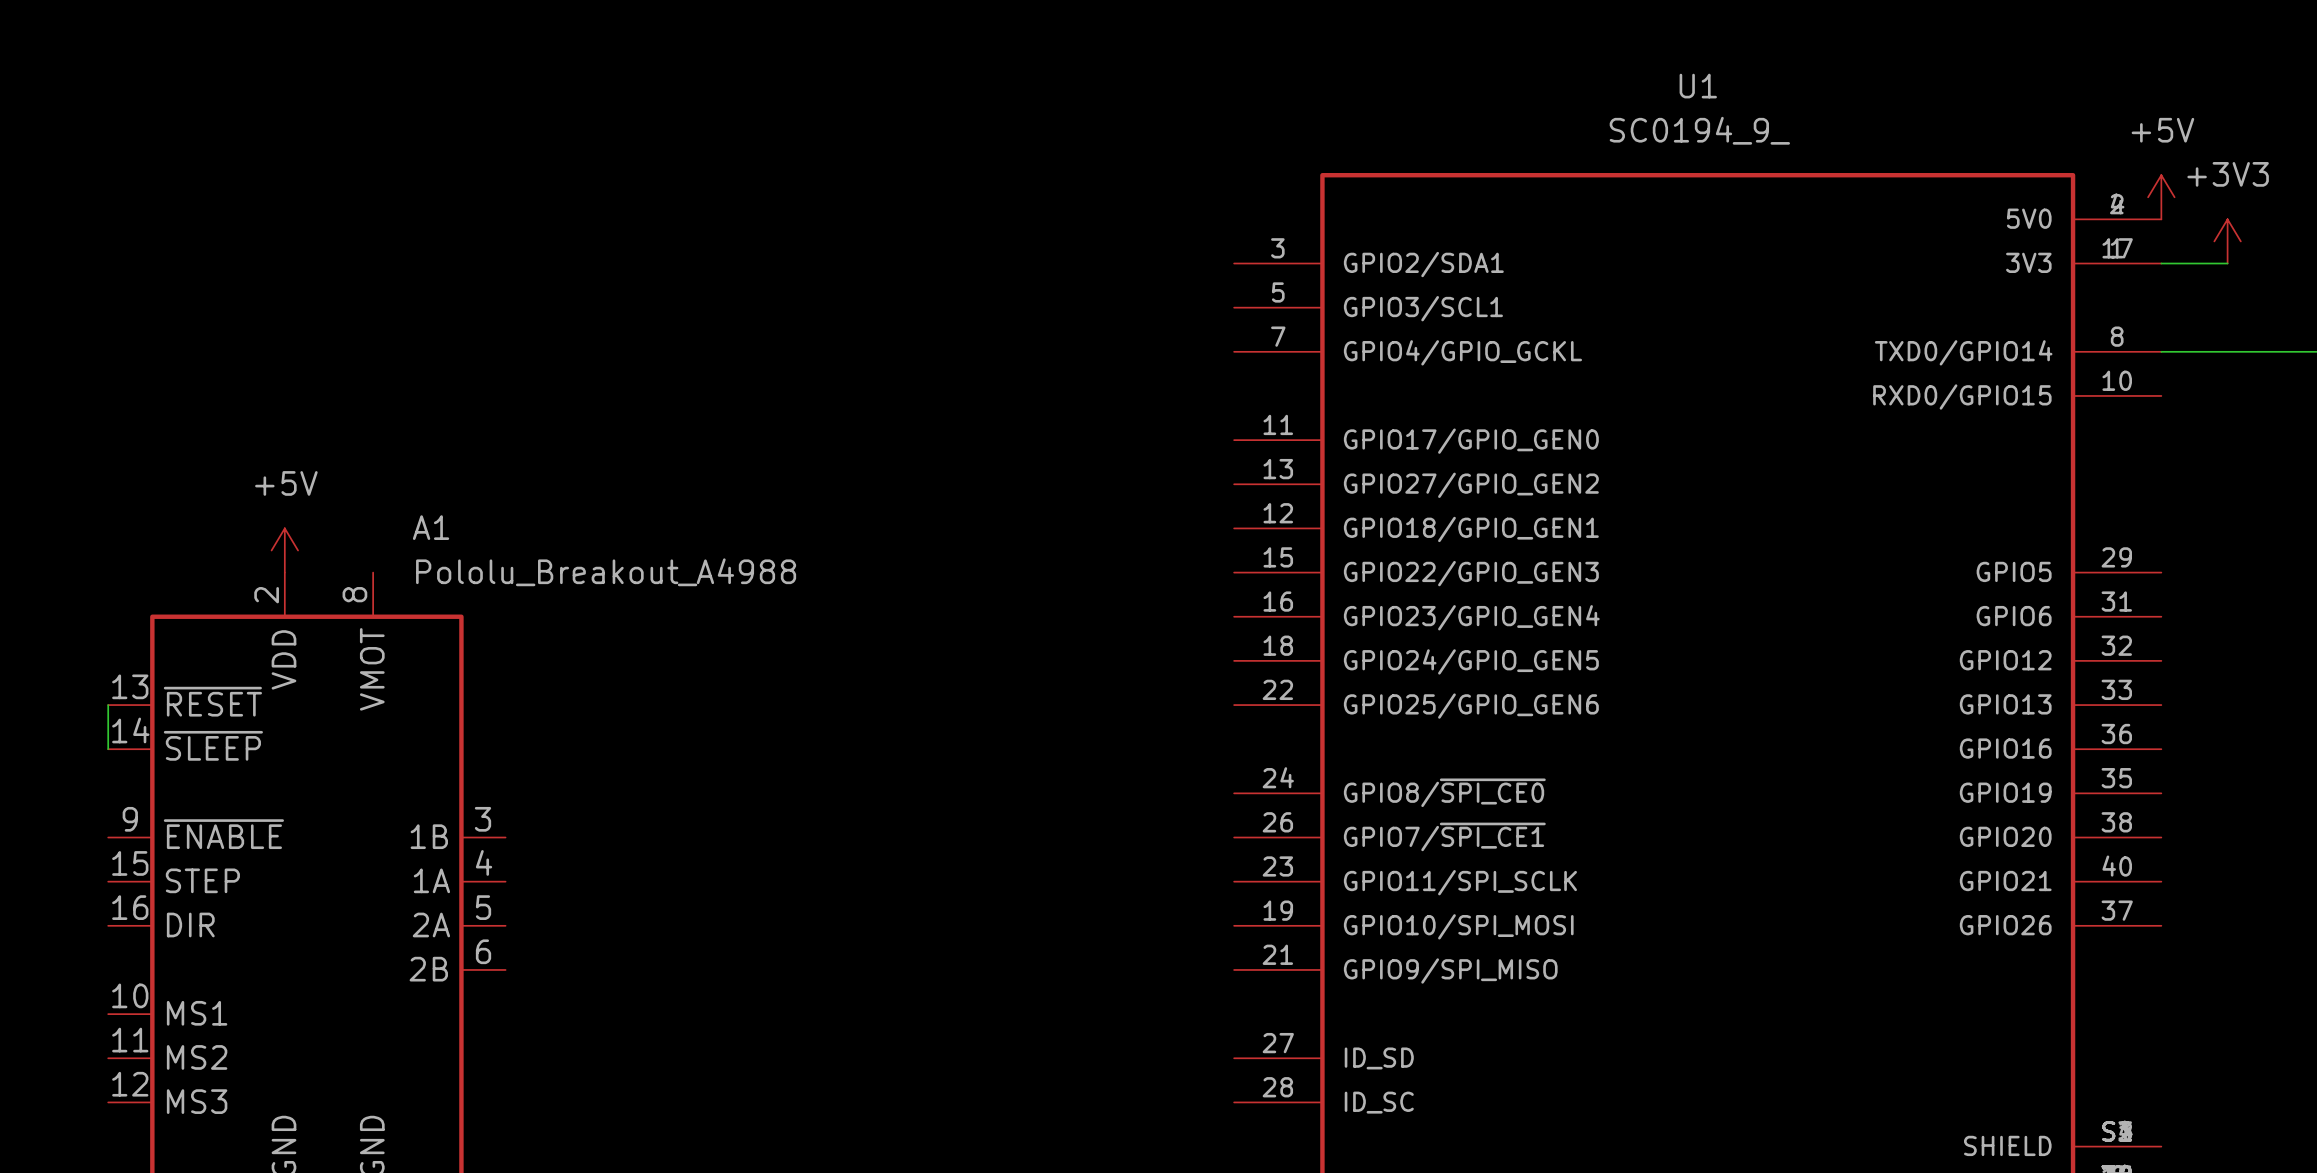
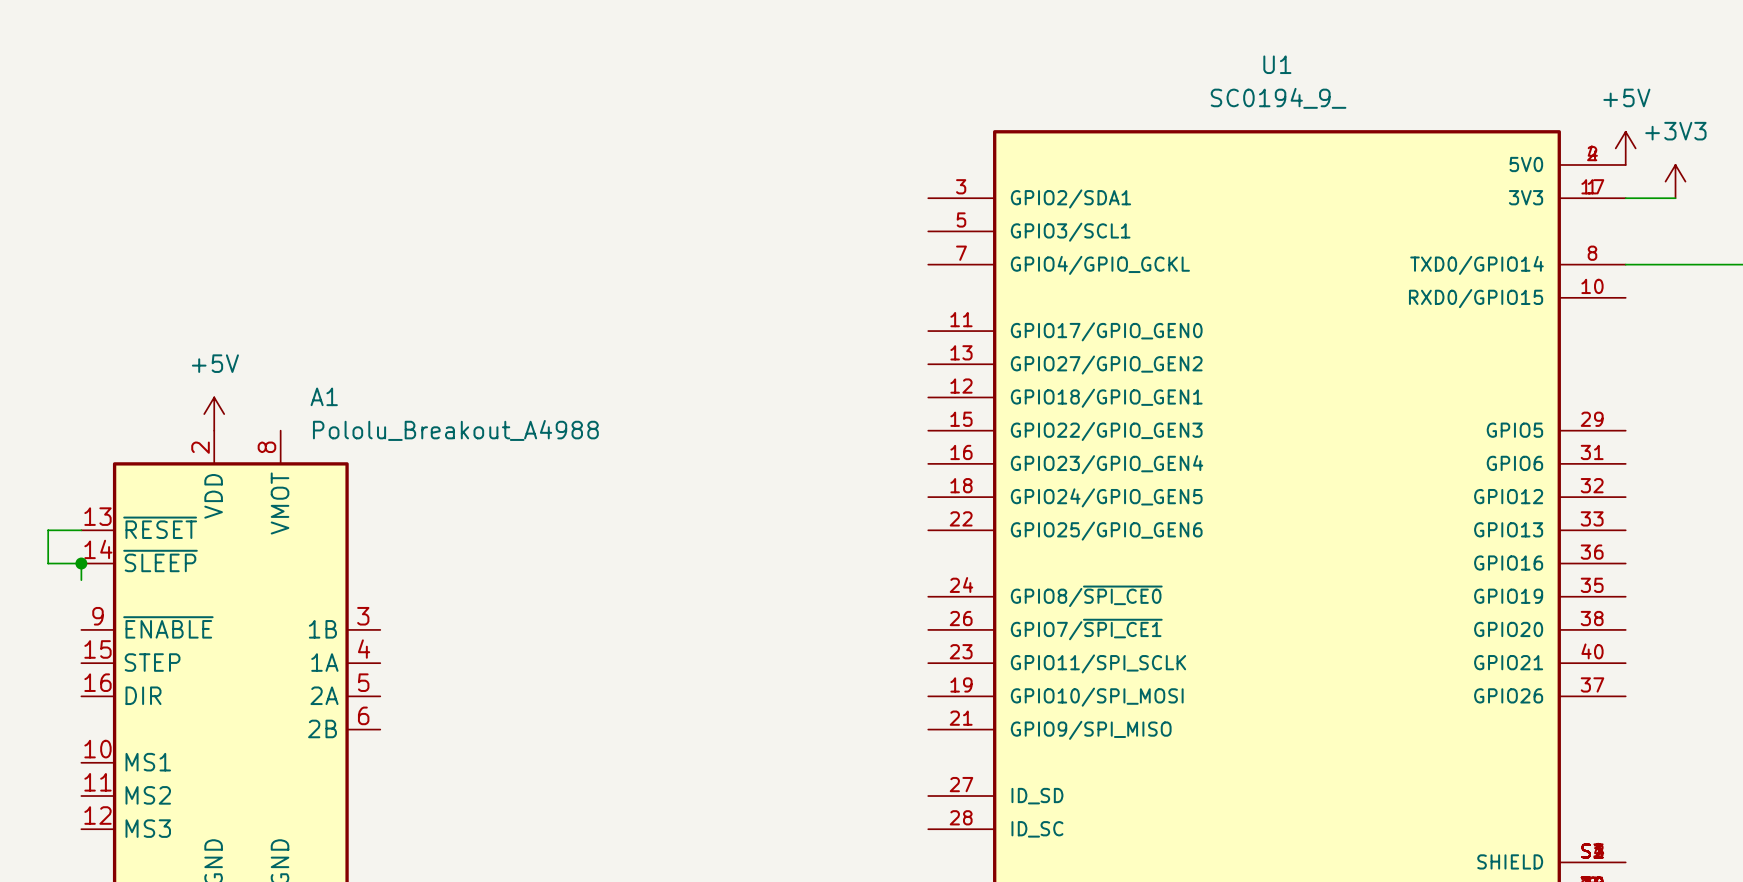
wire: (108, 705) (108, 749) -> (81, 530) (48, 530) (48, 563) (81, 563) (81, 580)
junction: none -> (81, 563)

